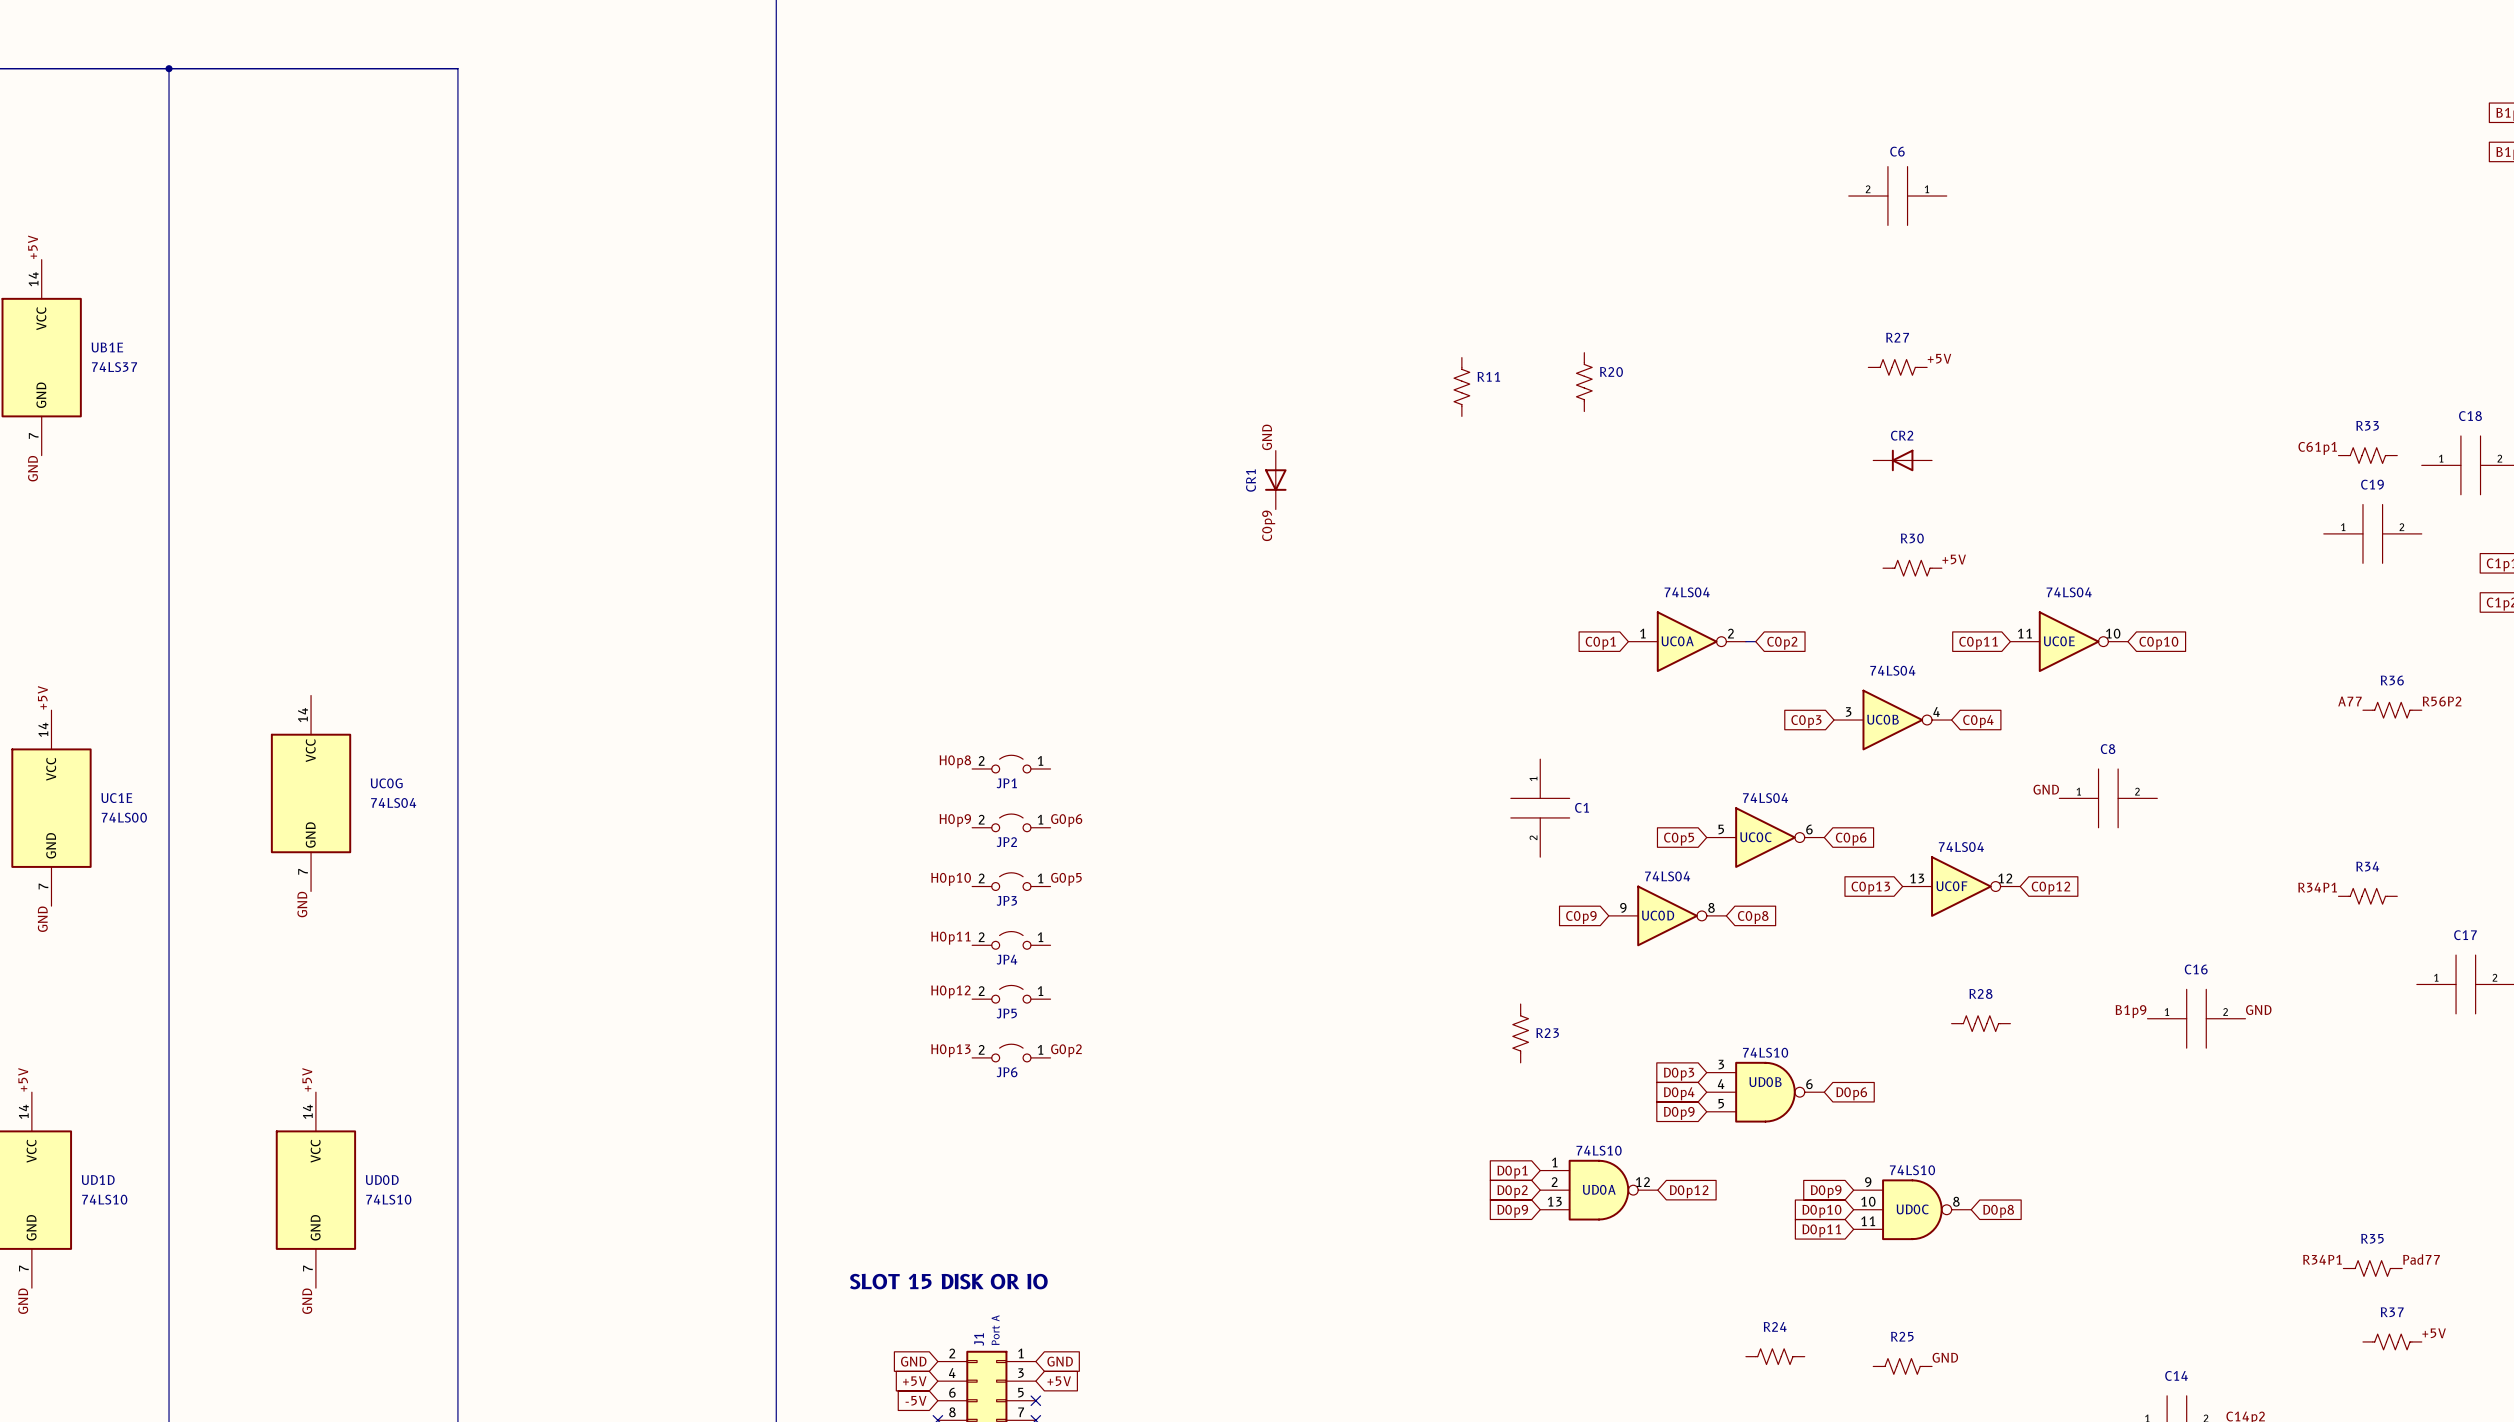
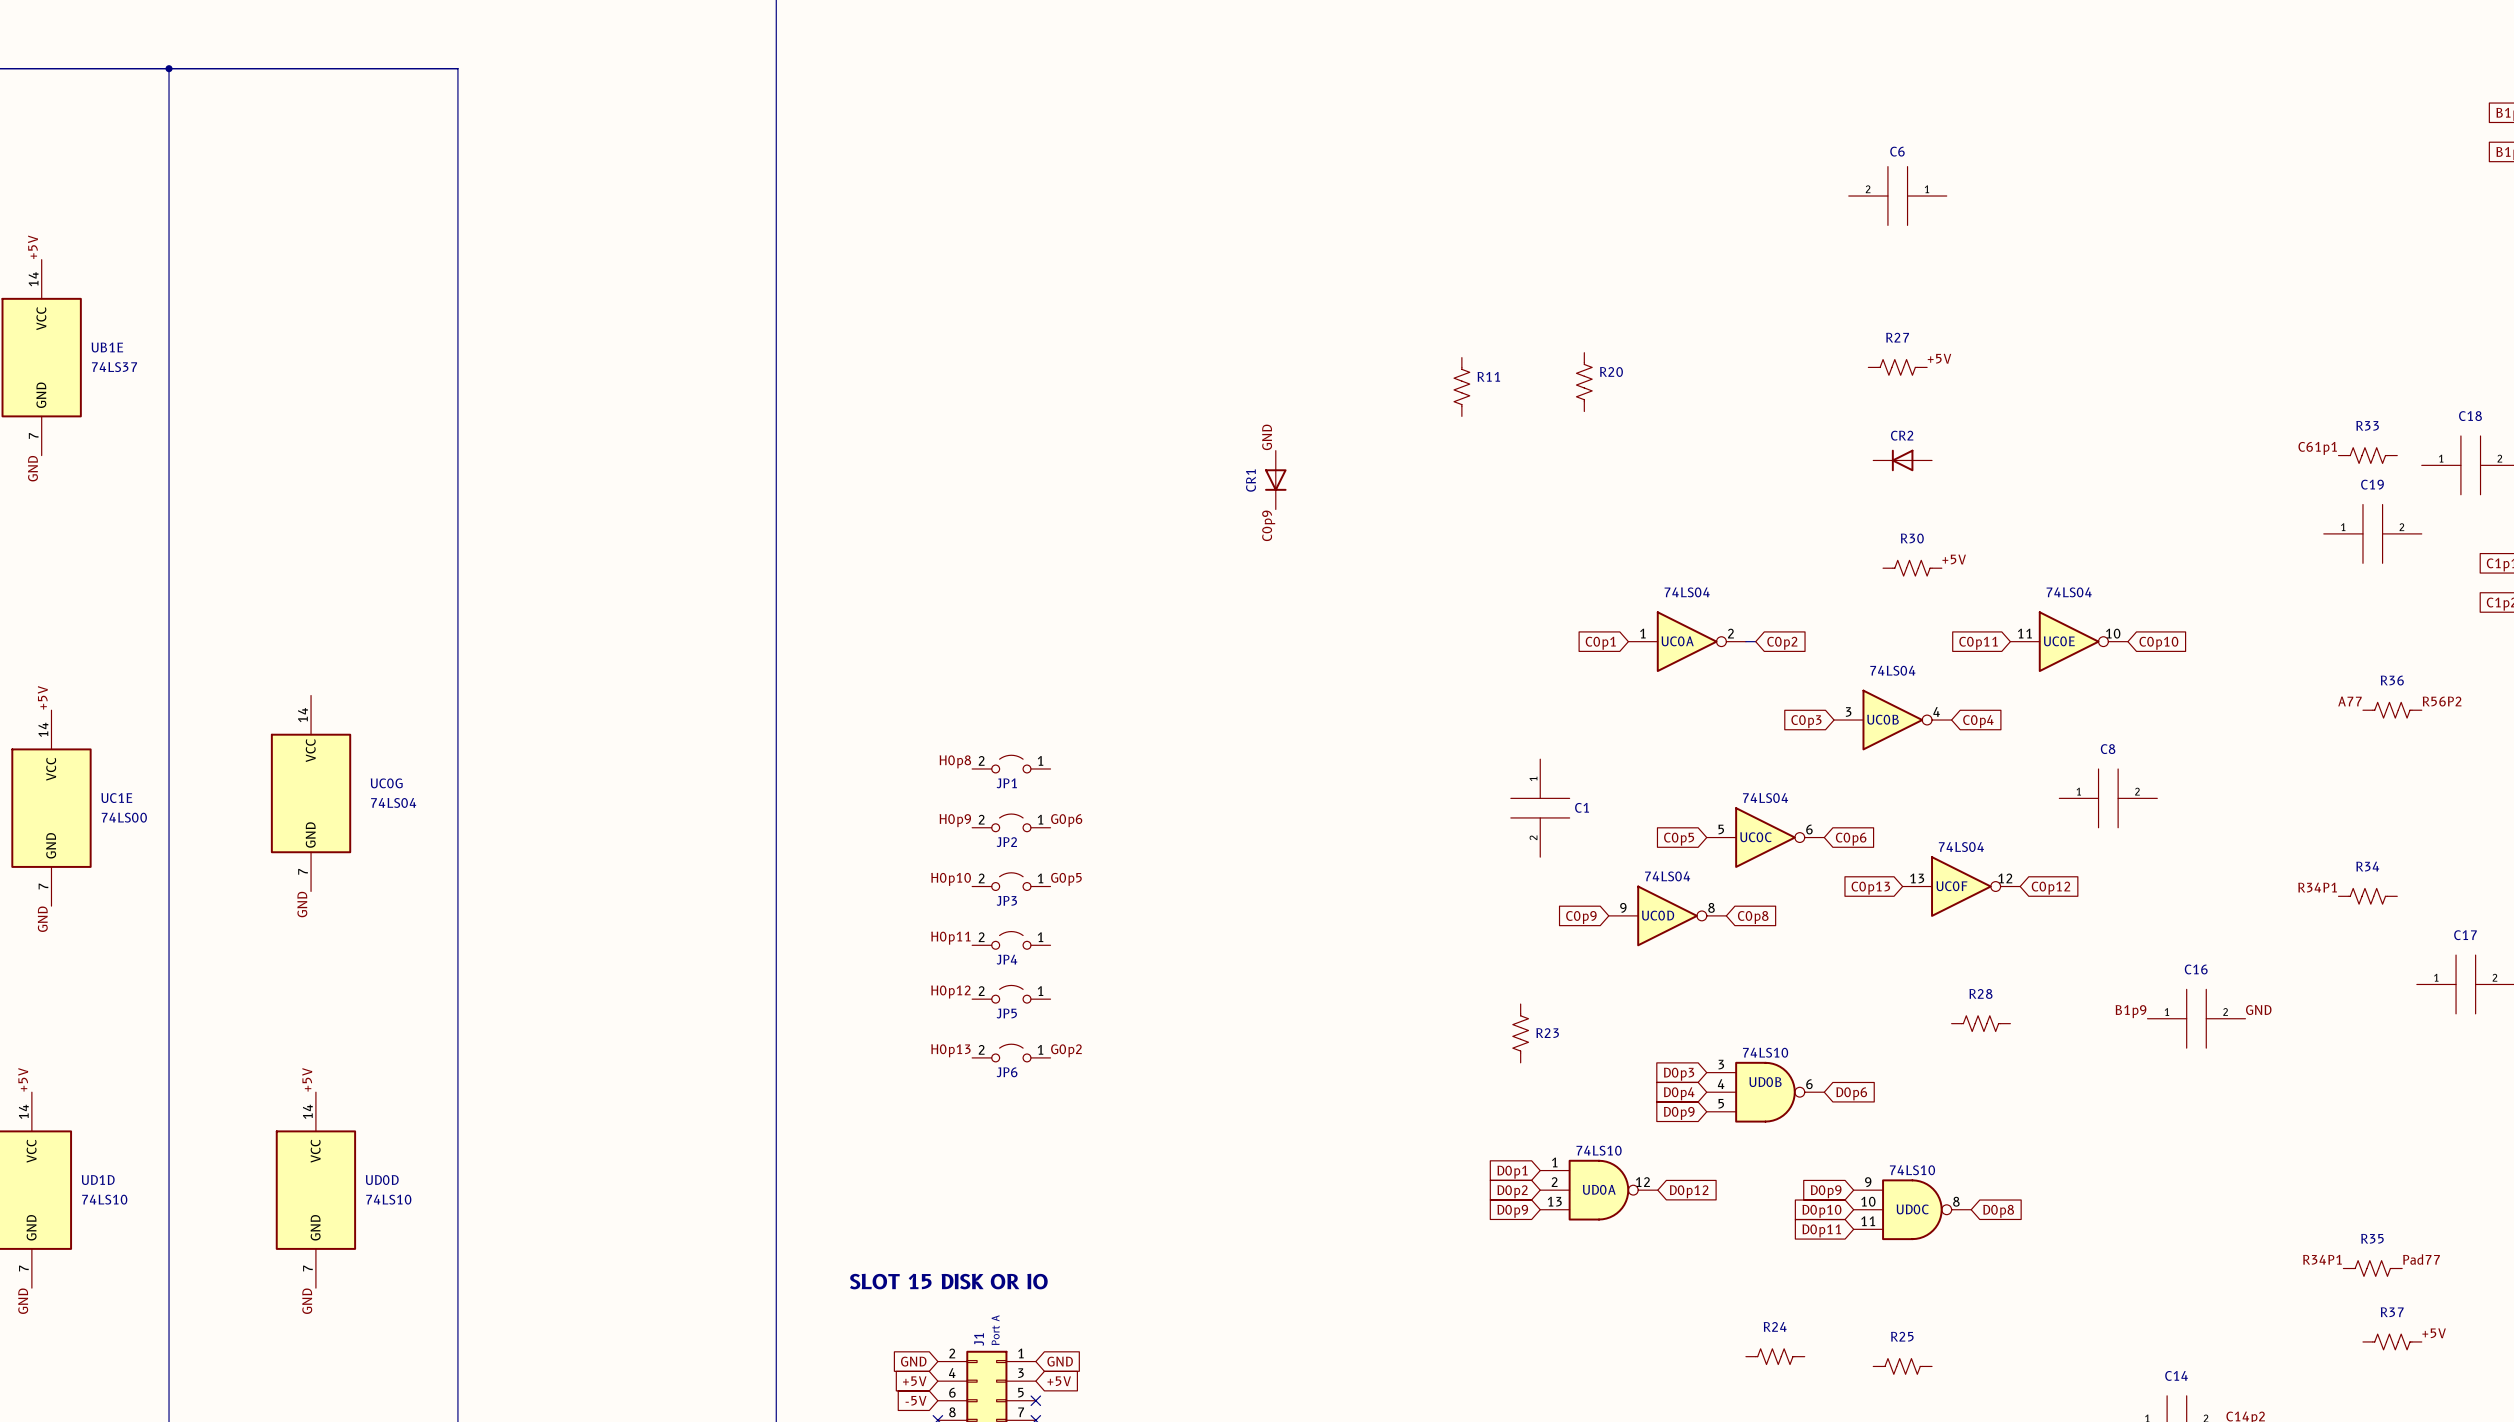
label: GND (2046, 789) -> none
label: GND (1945, 1357) -> none

